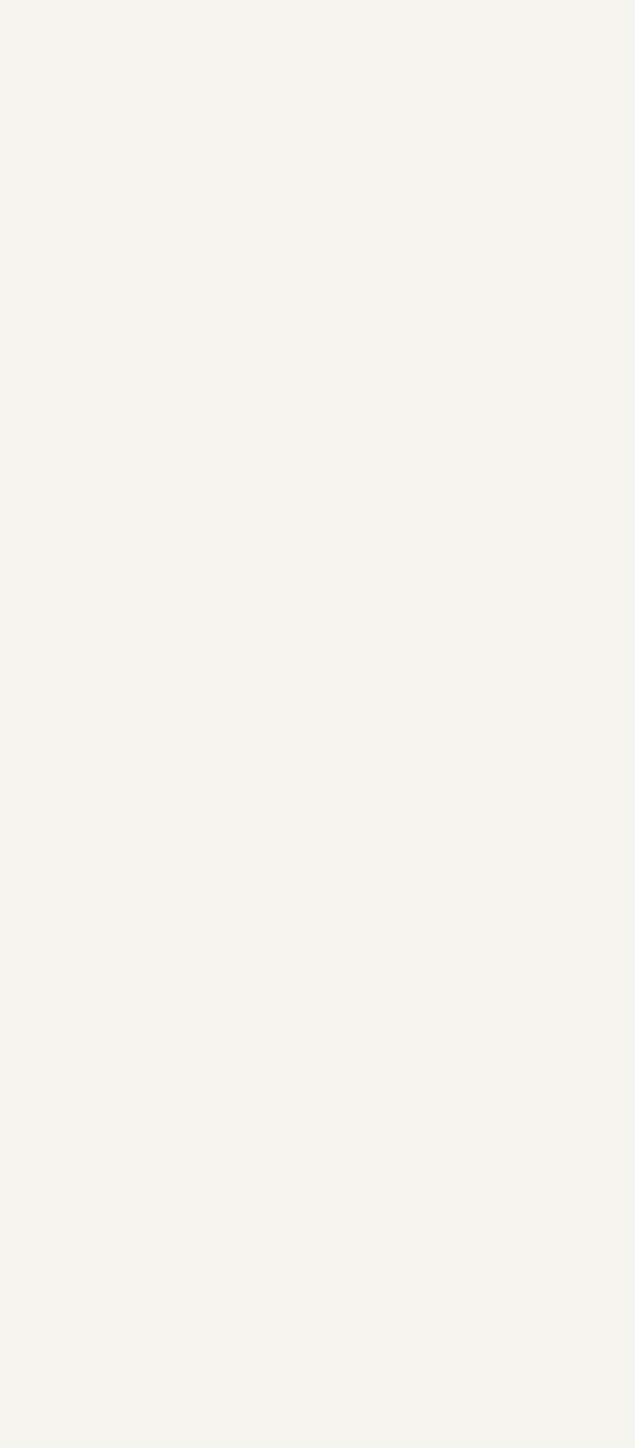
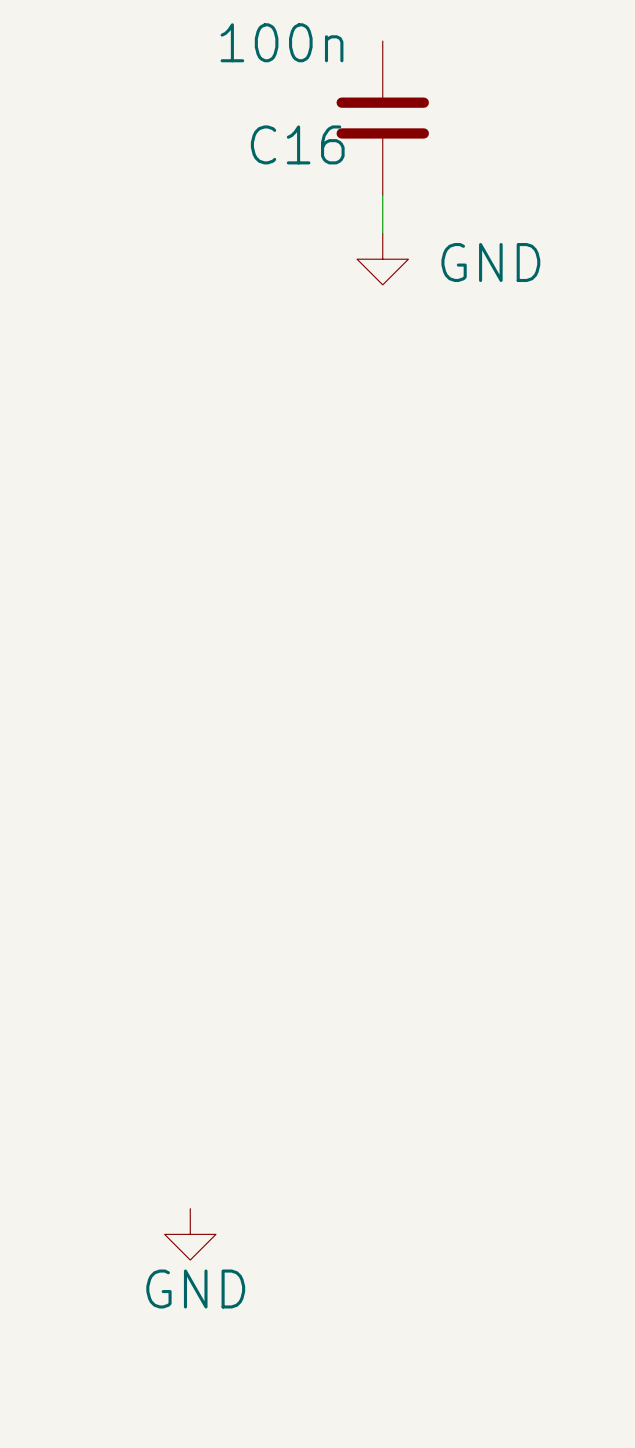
C16: none -> 100n (382, 118)
wire: none -> (382, 195) (382, 233)
power symbol: none -> GND (382, 259)
power symbol: none -> GND (190, 1234)

